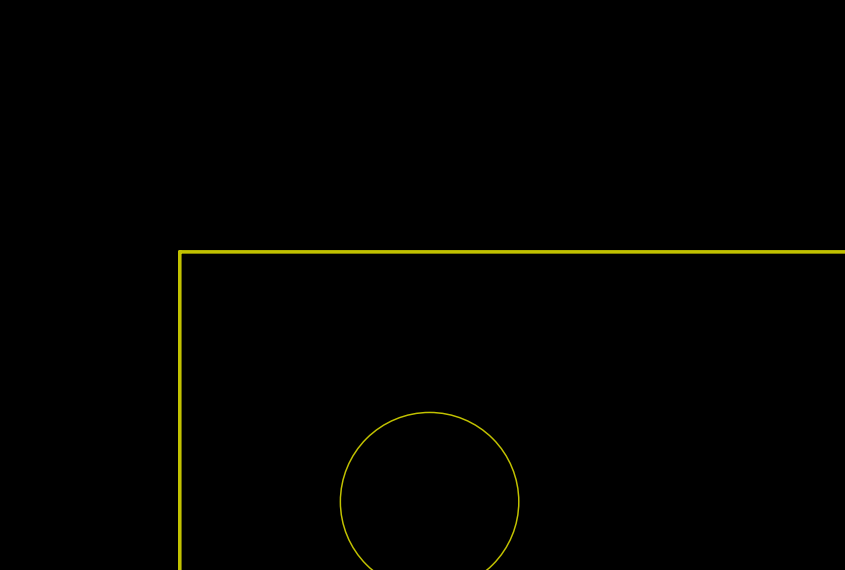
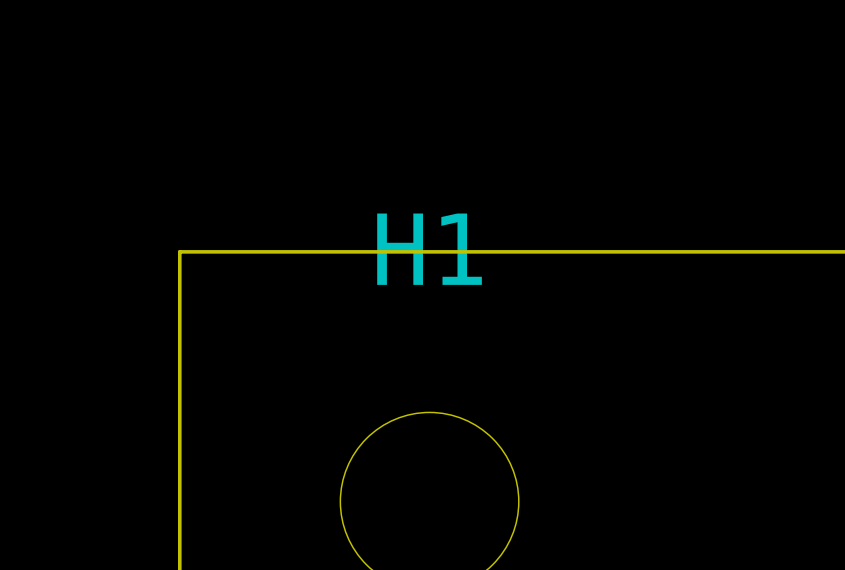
H1 name: none -> H1 (429, 249)

